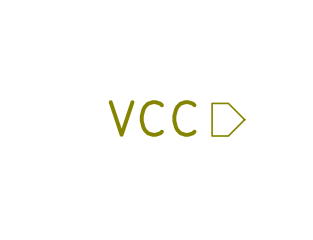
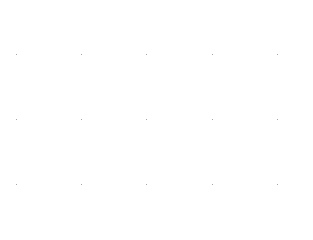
hierarchical label: VCC (152, 118) -> none

